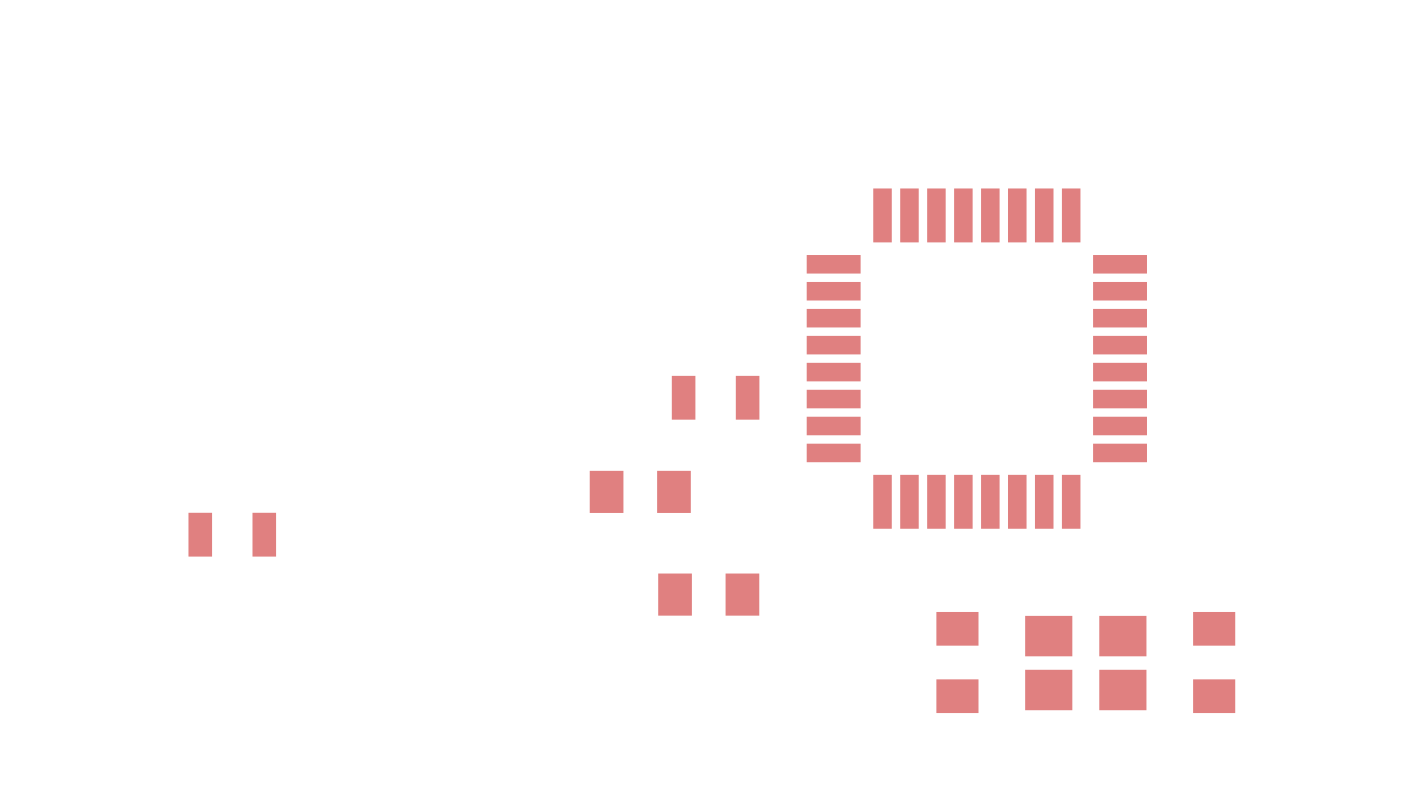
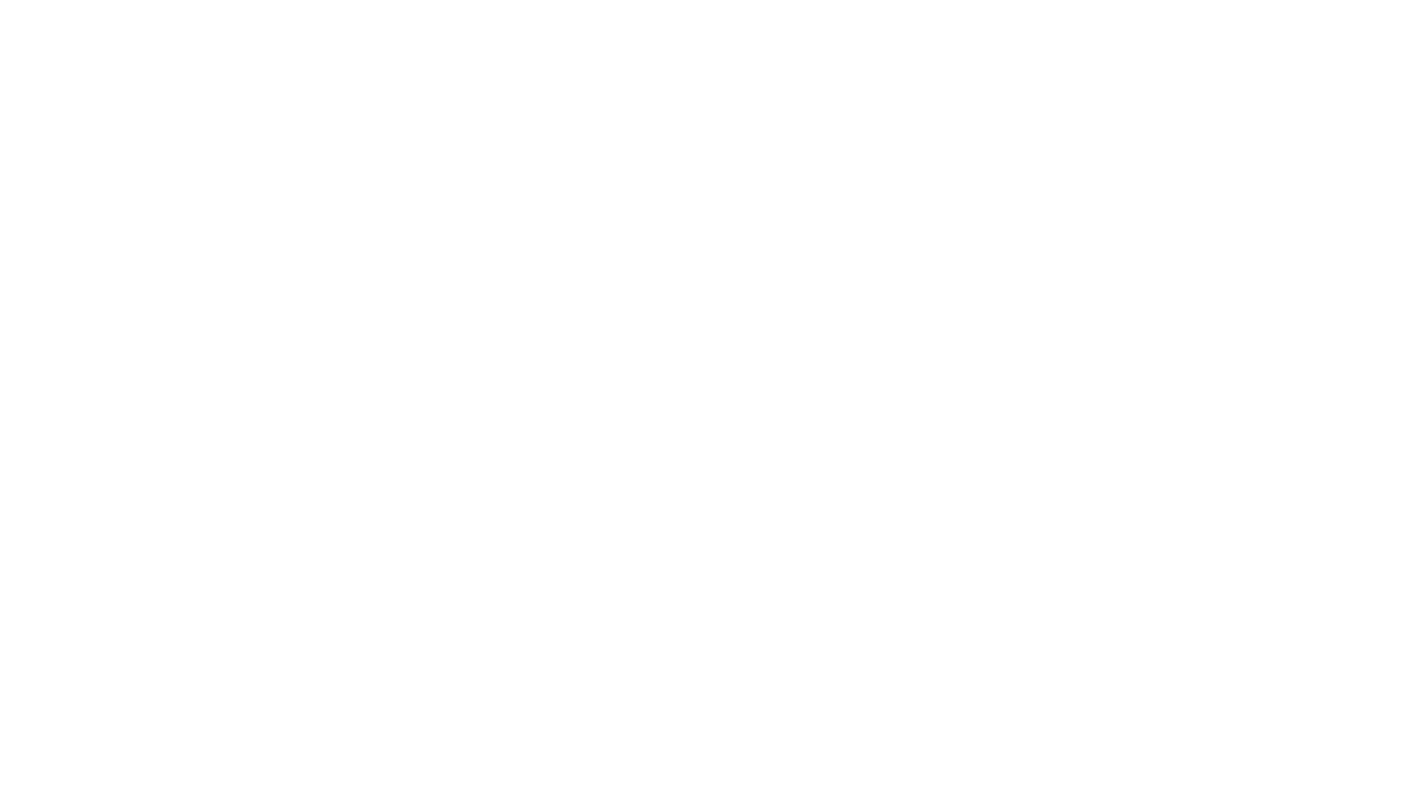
part: (976, 358) -> none
part: (715, 397) -> none
part: (640, 491) -> none
part: (232, 534) -> none
part: (708, 594) -> none
part: (957, 662) -> none
part: (1214, 662) -> none
part: (1085, 663) -> none

